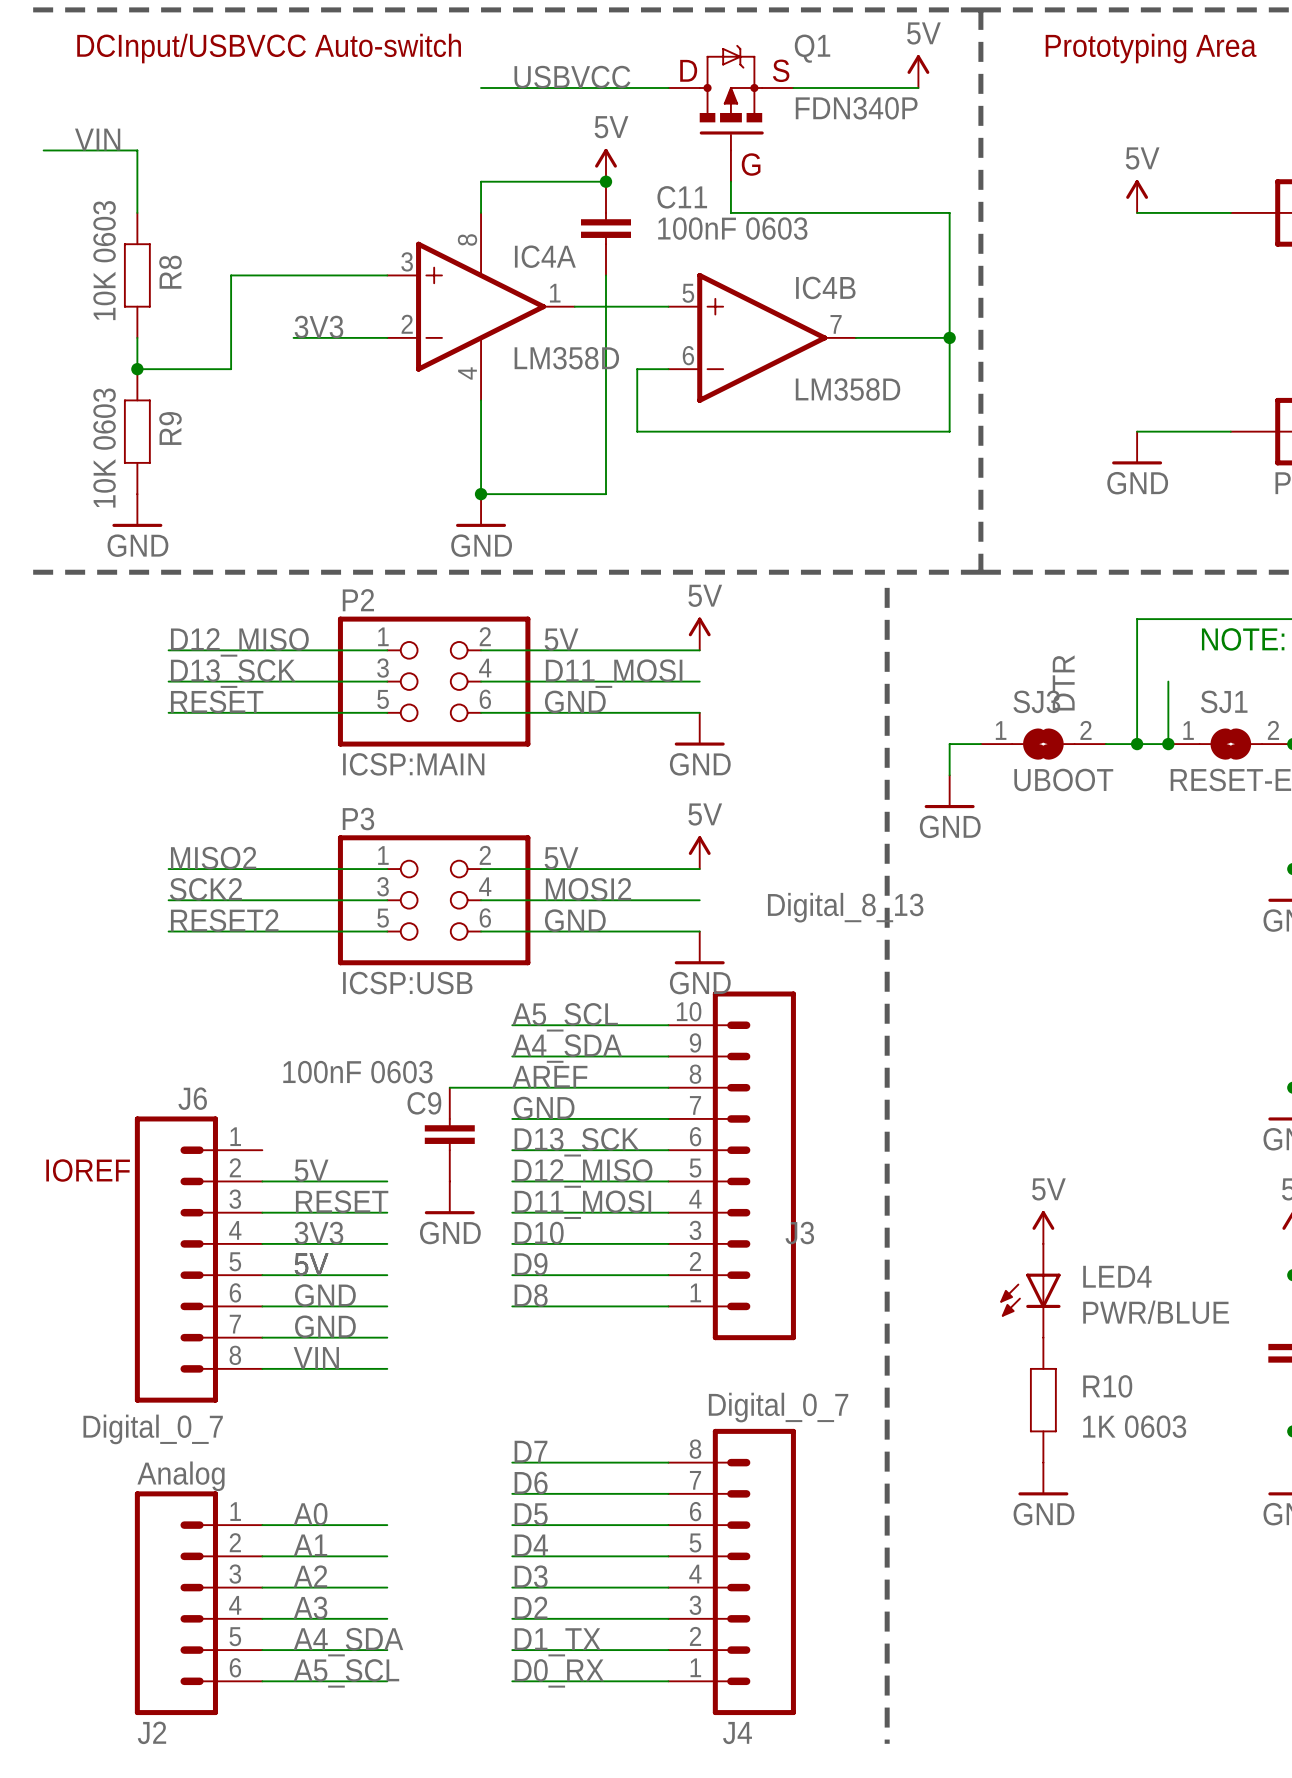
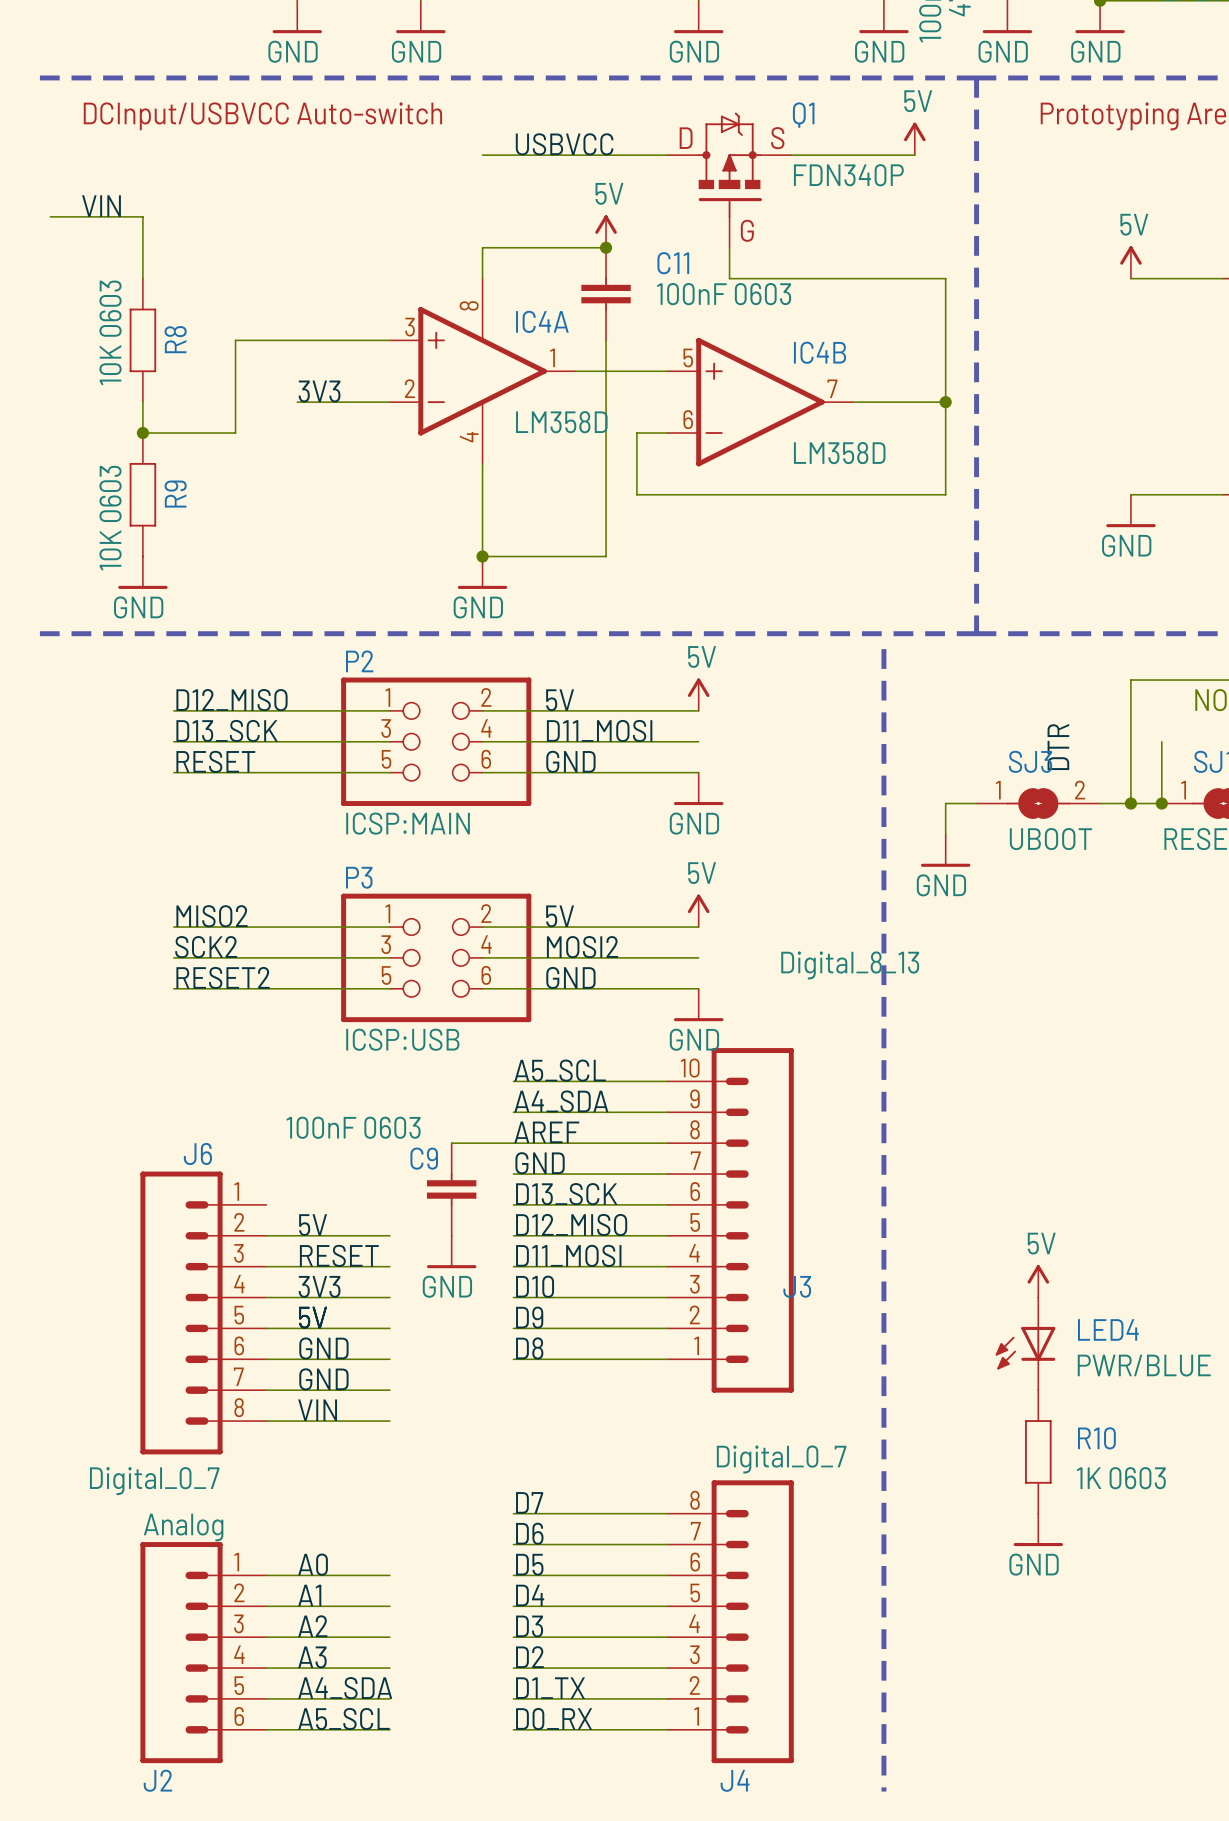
text: IOREF (88, 1170) -> none

